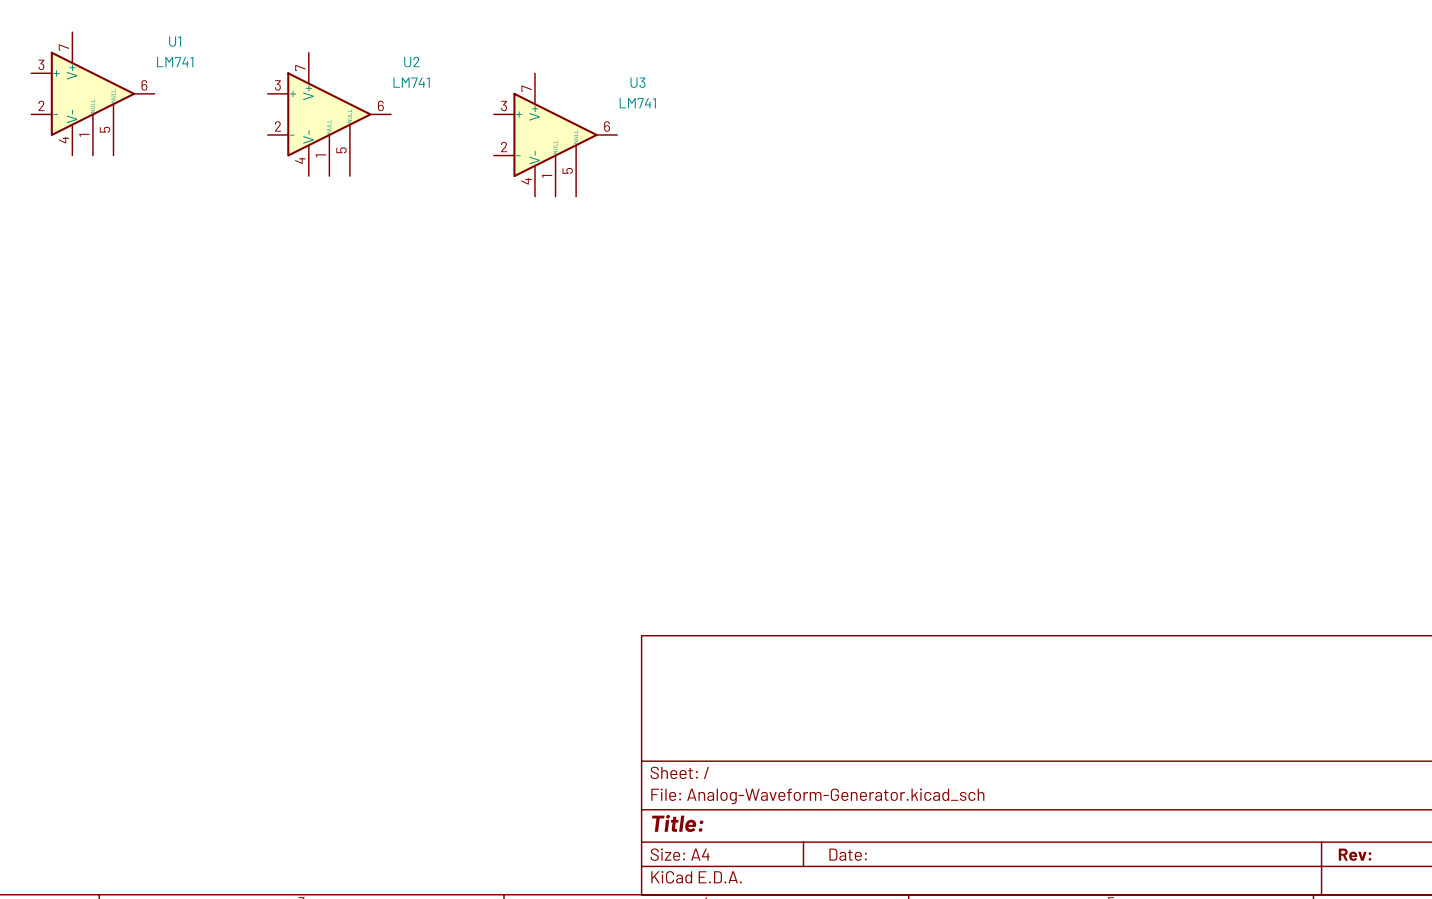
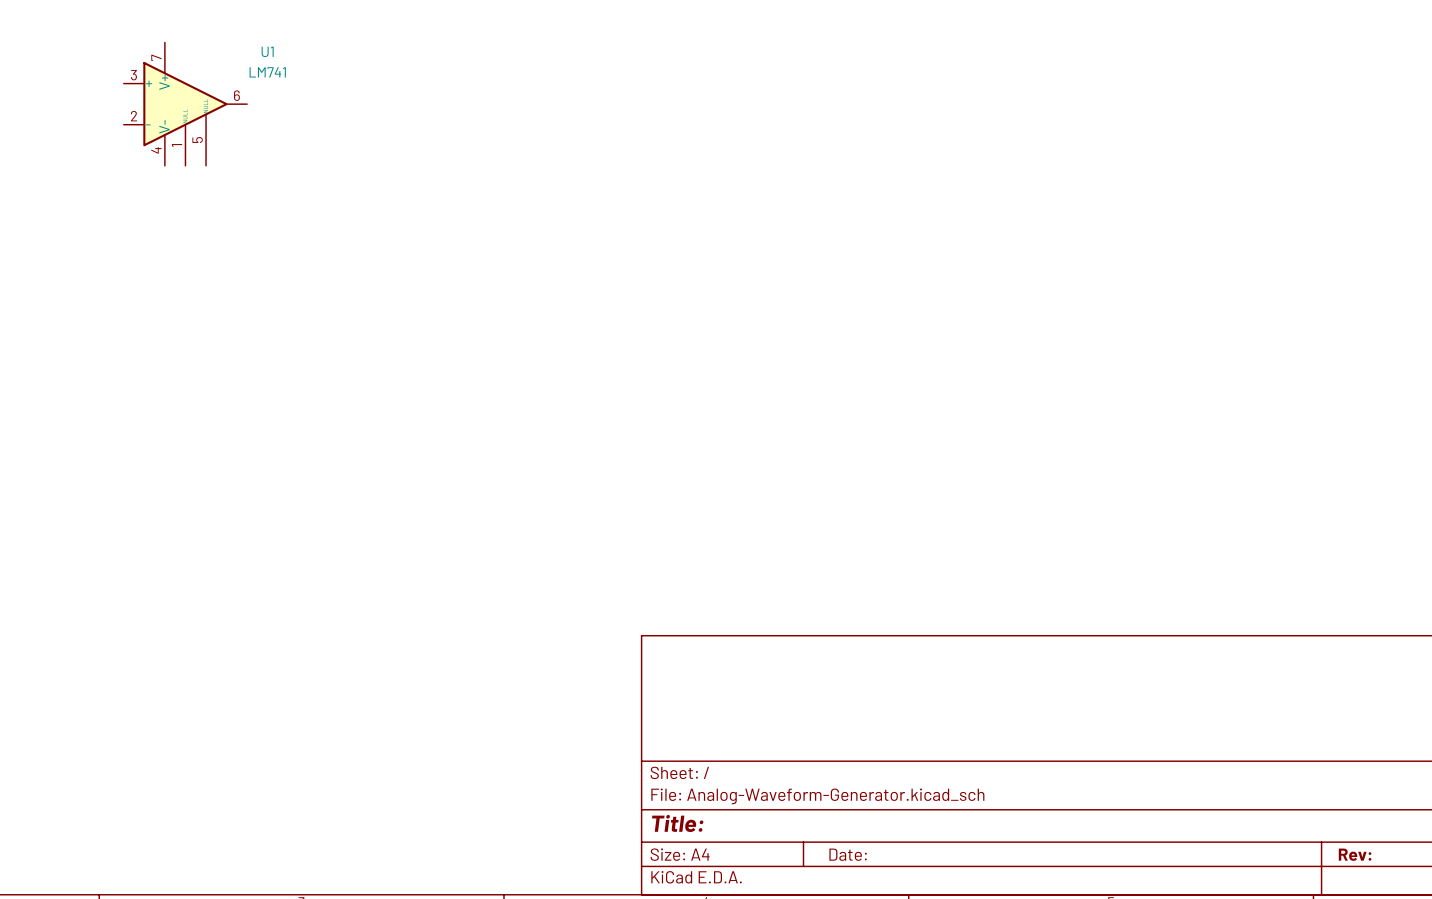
U1 position: (92, 93) -> (185, 104)
U2: LM741 (329, 114) -> none
U3: LM741 (555, 134) -> none

